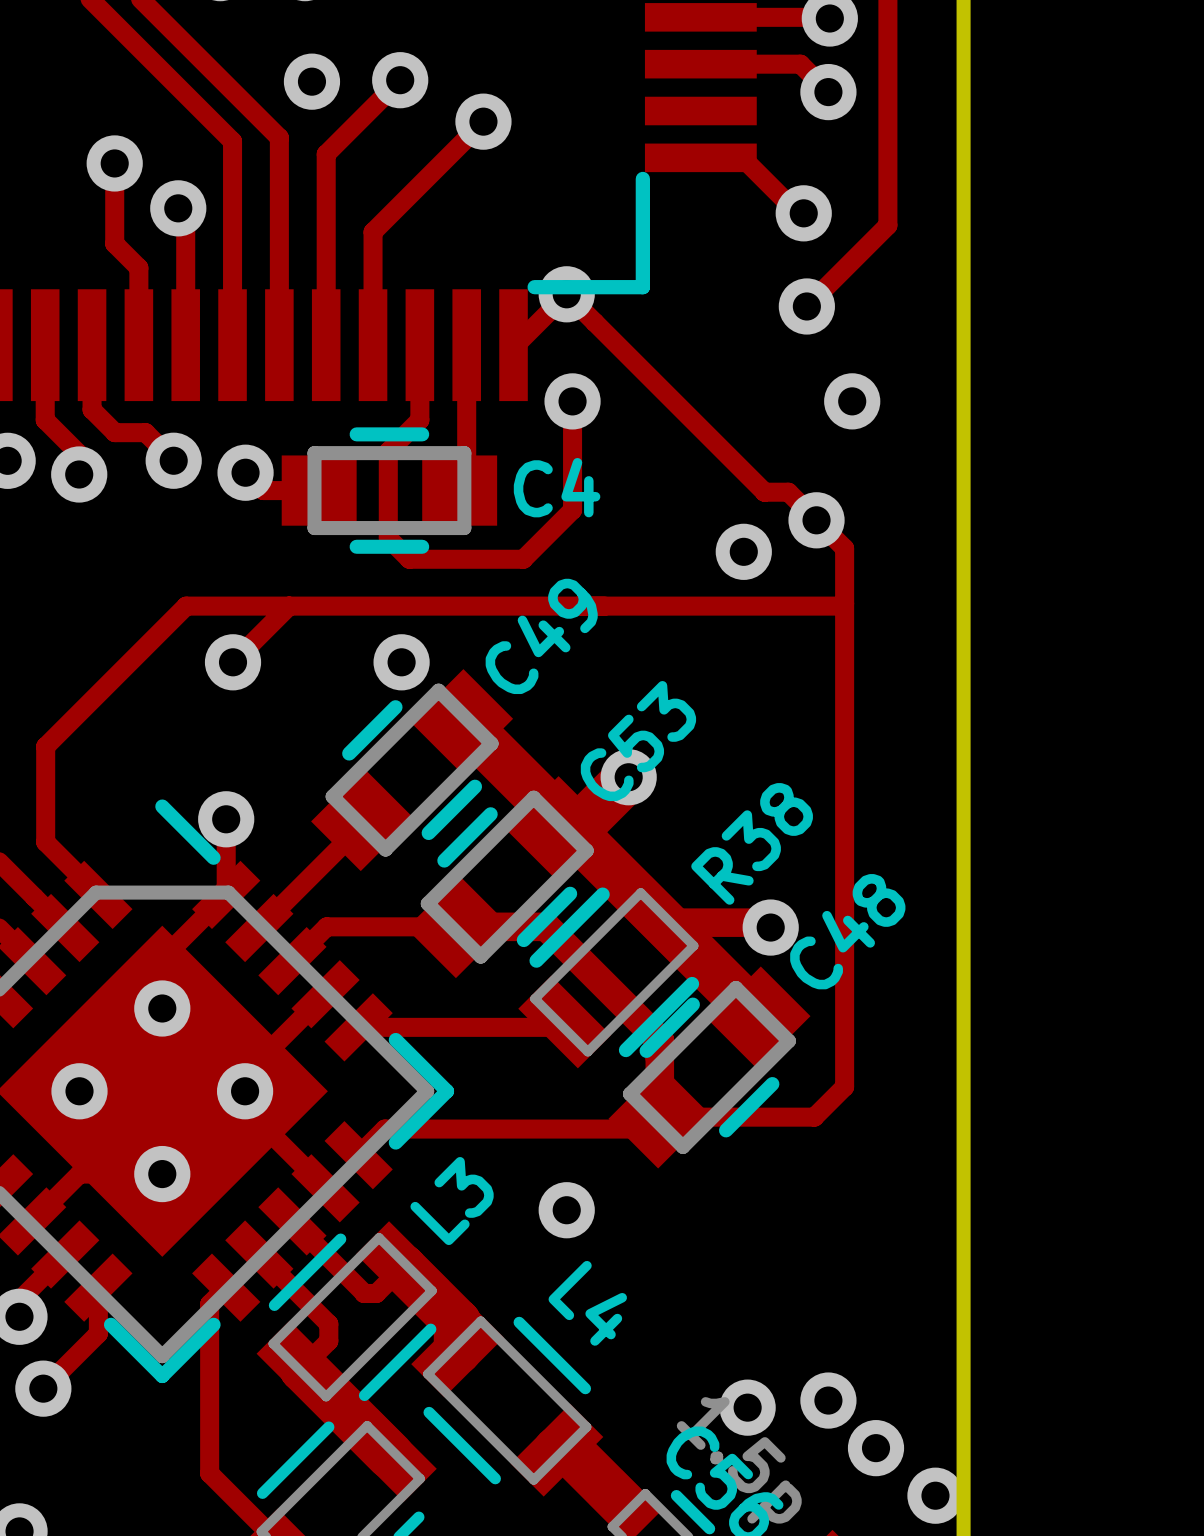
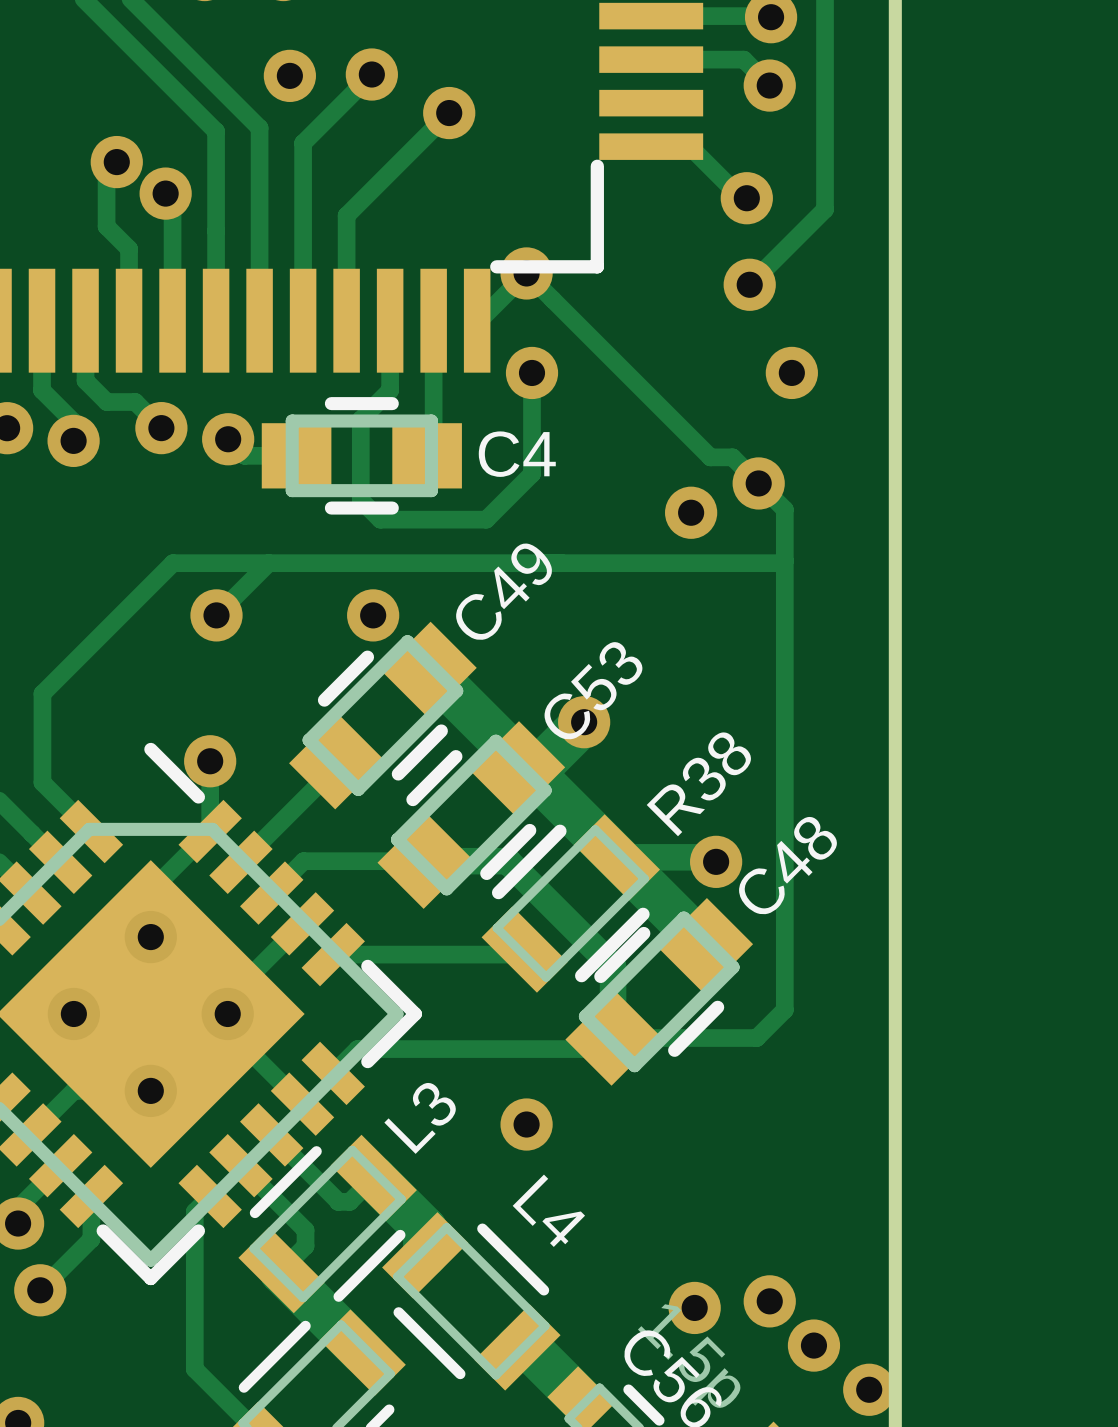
via position: (114, 163) -> (116, 162)

